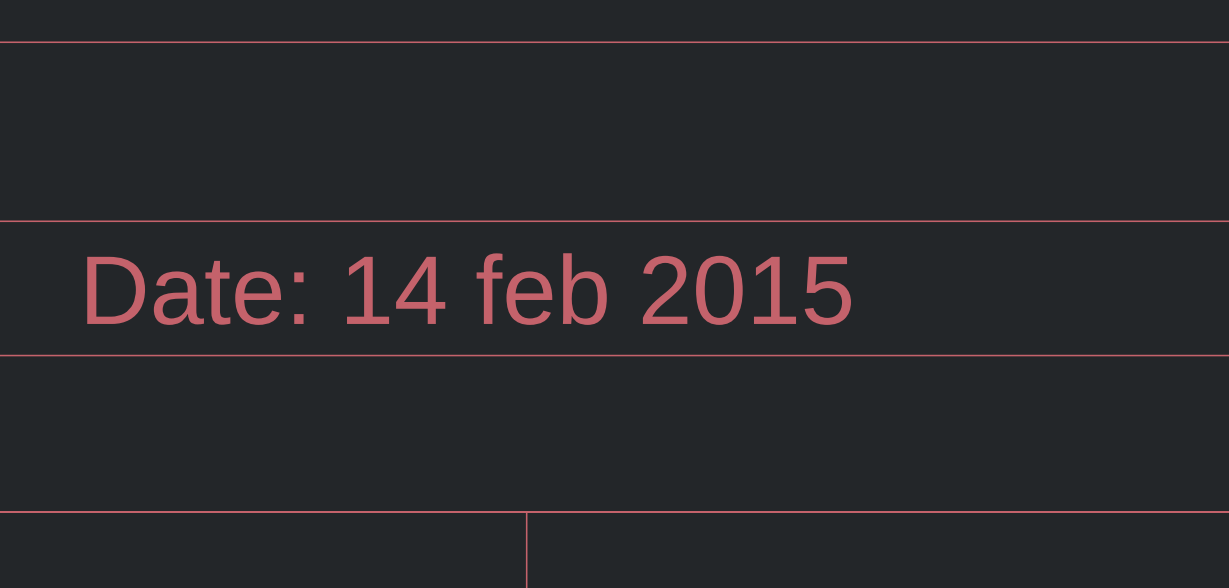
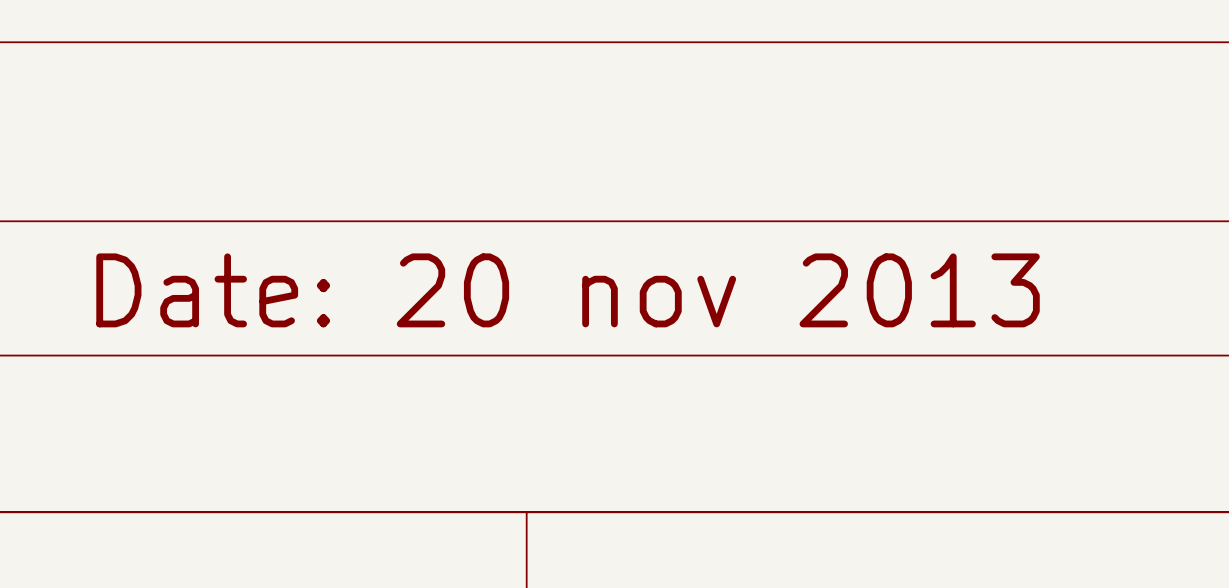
title block: Date: 14 feb 2015 (469, 289) -> Date: 20 nov 2013 (568, 290)

